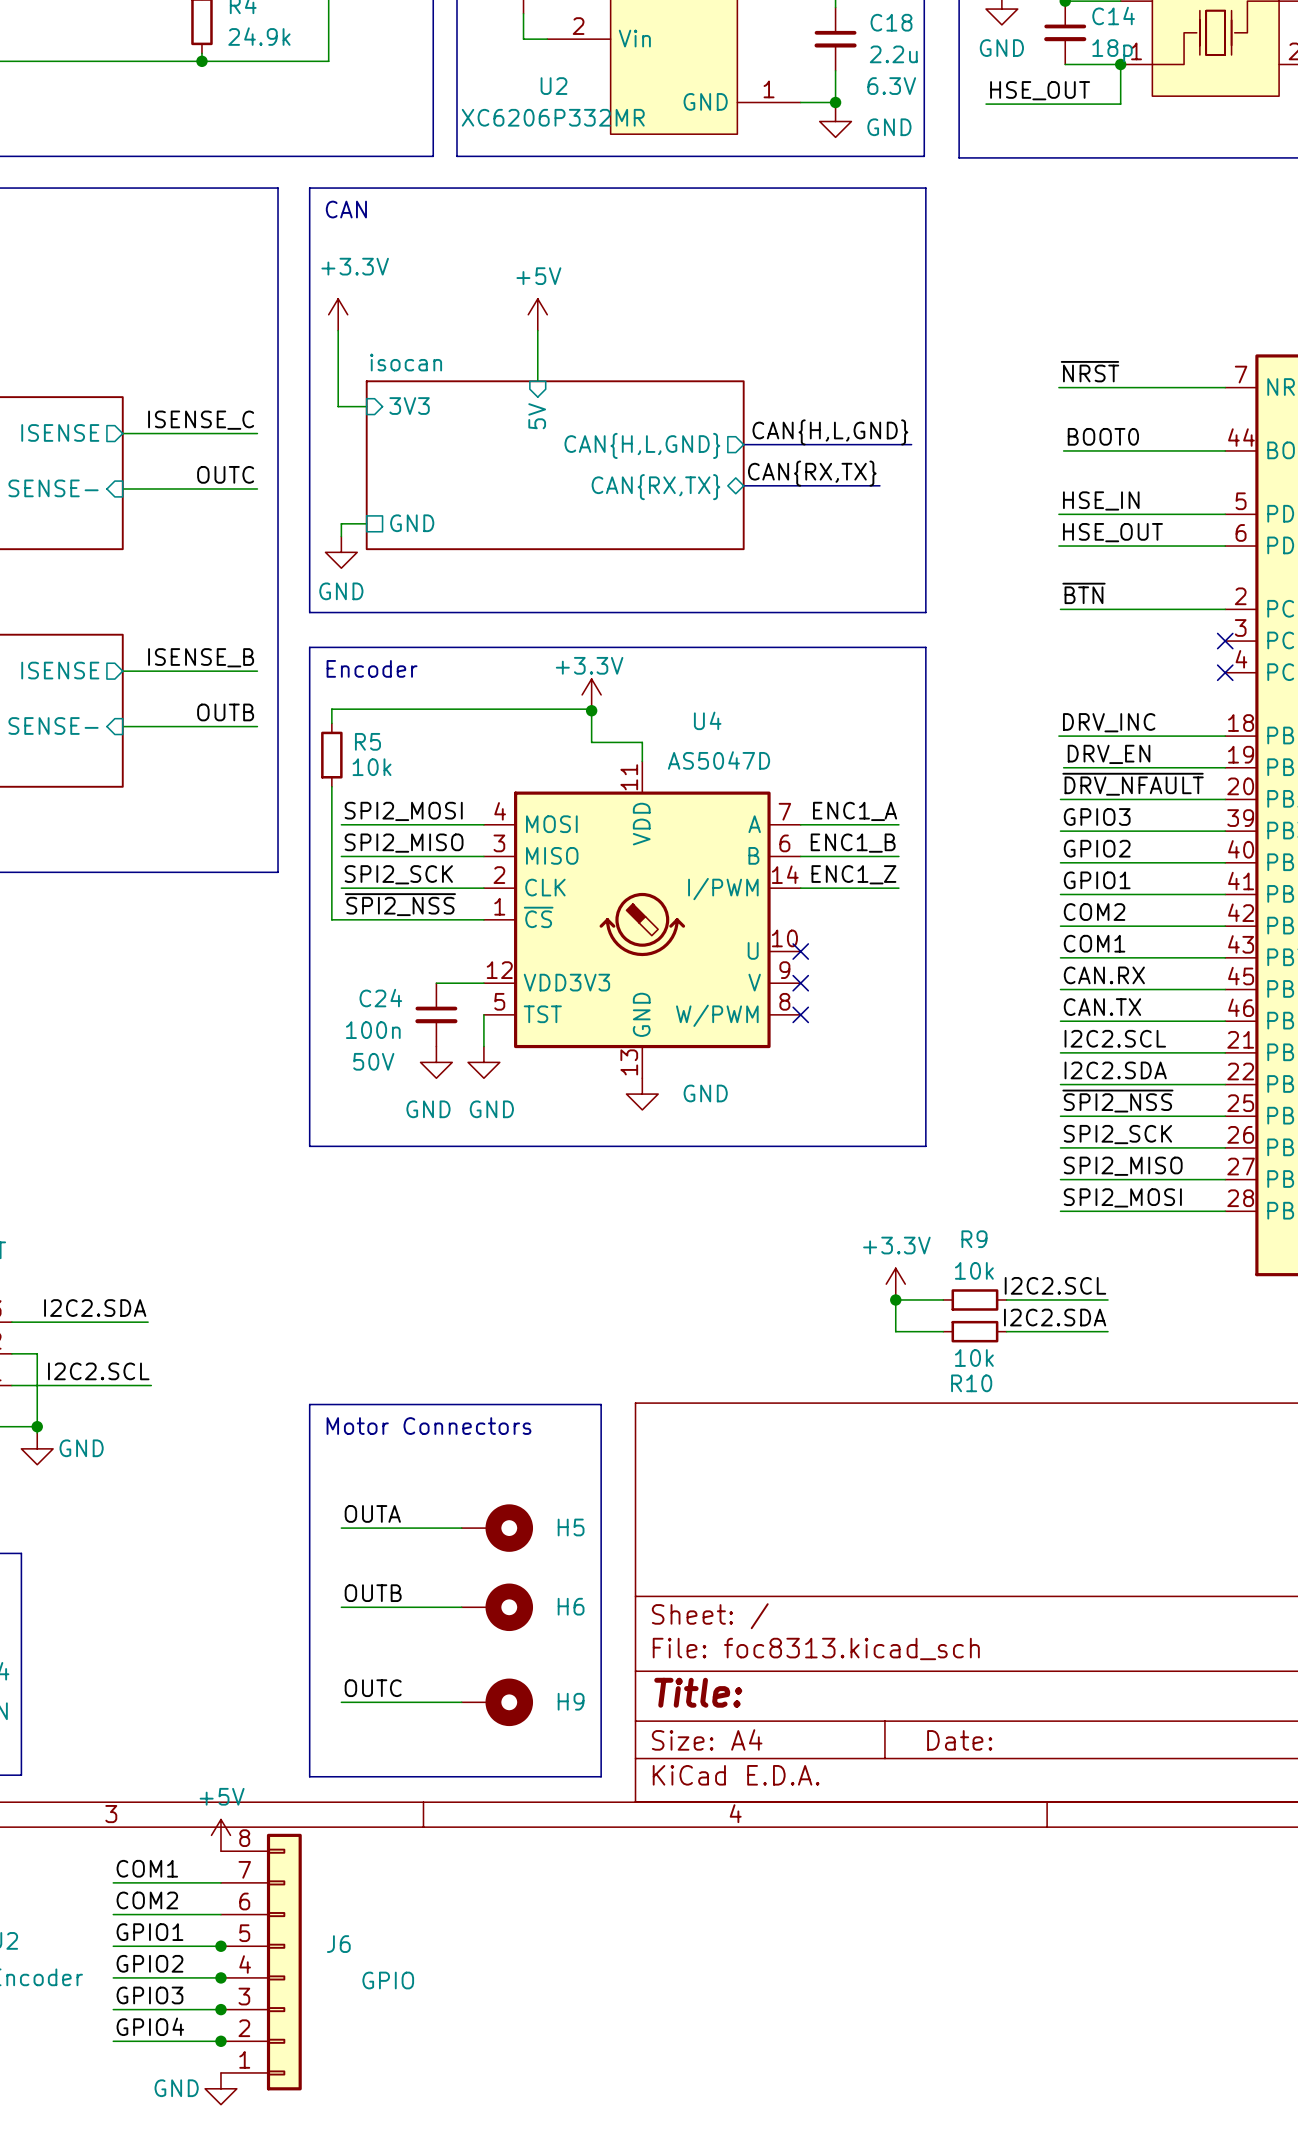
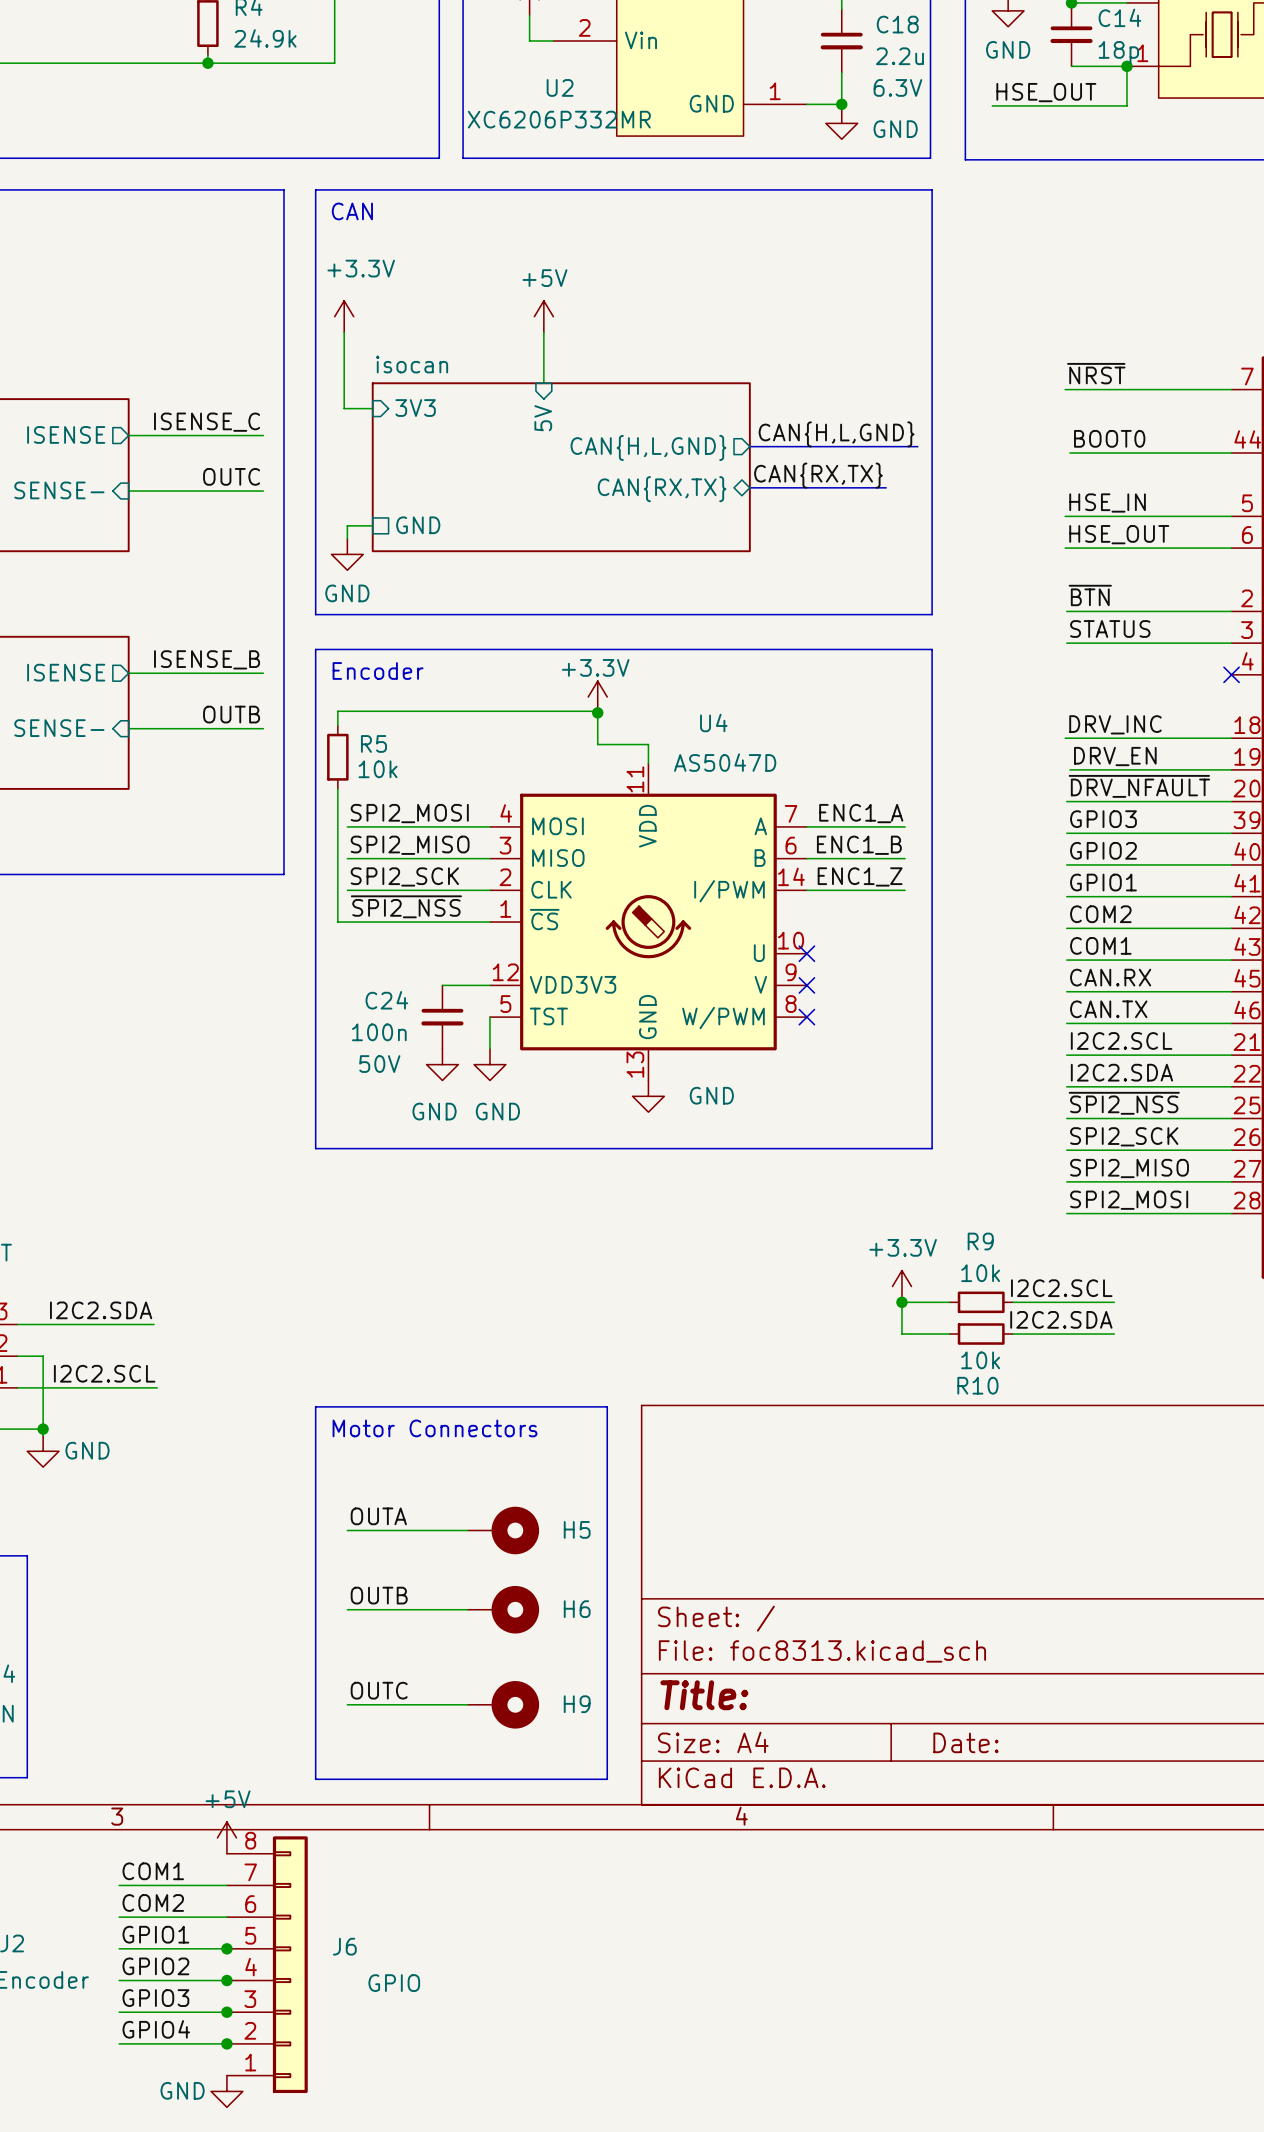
label: none -> STATUS (1110, 628)
wire: none -> (1066, 643) (1231, 643)
no-connect mark: (1225, 641) -> none

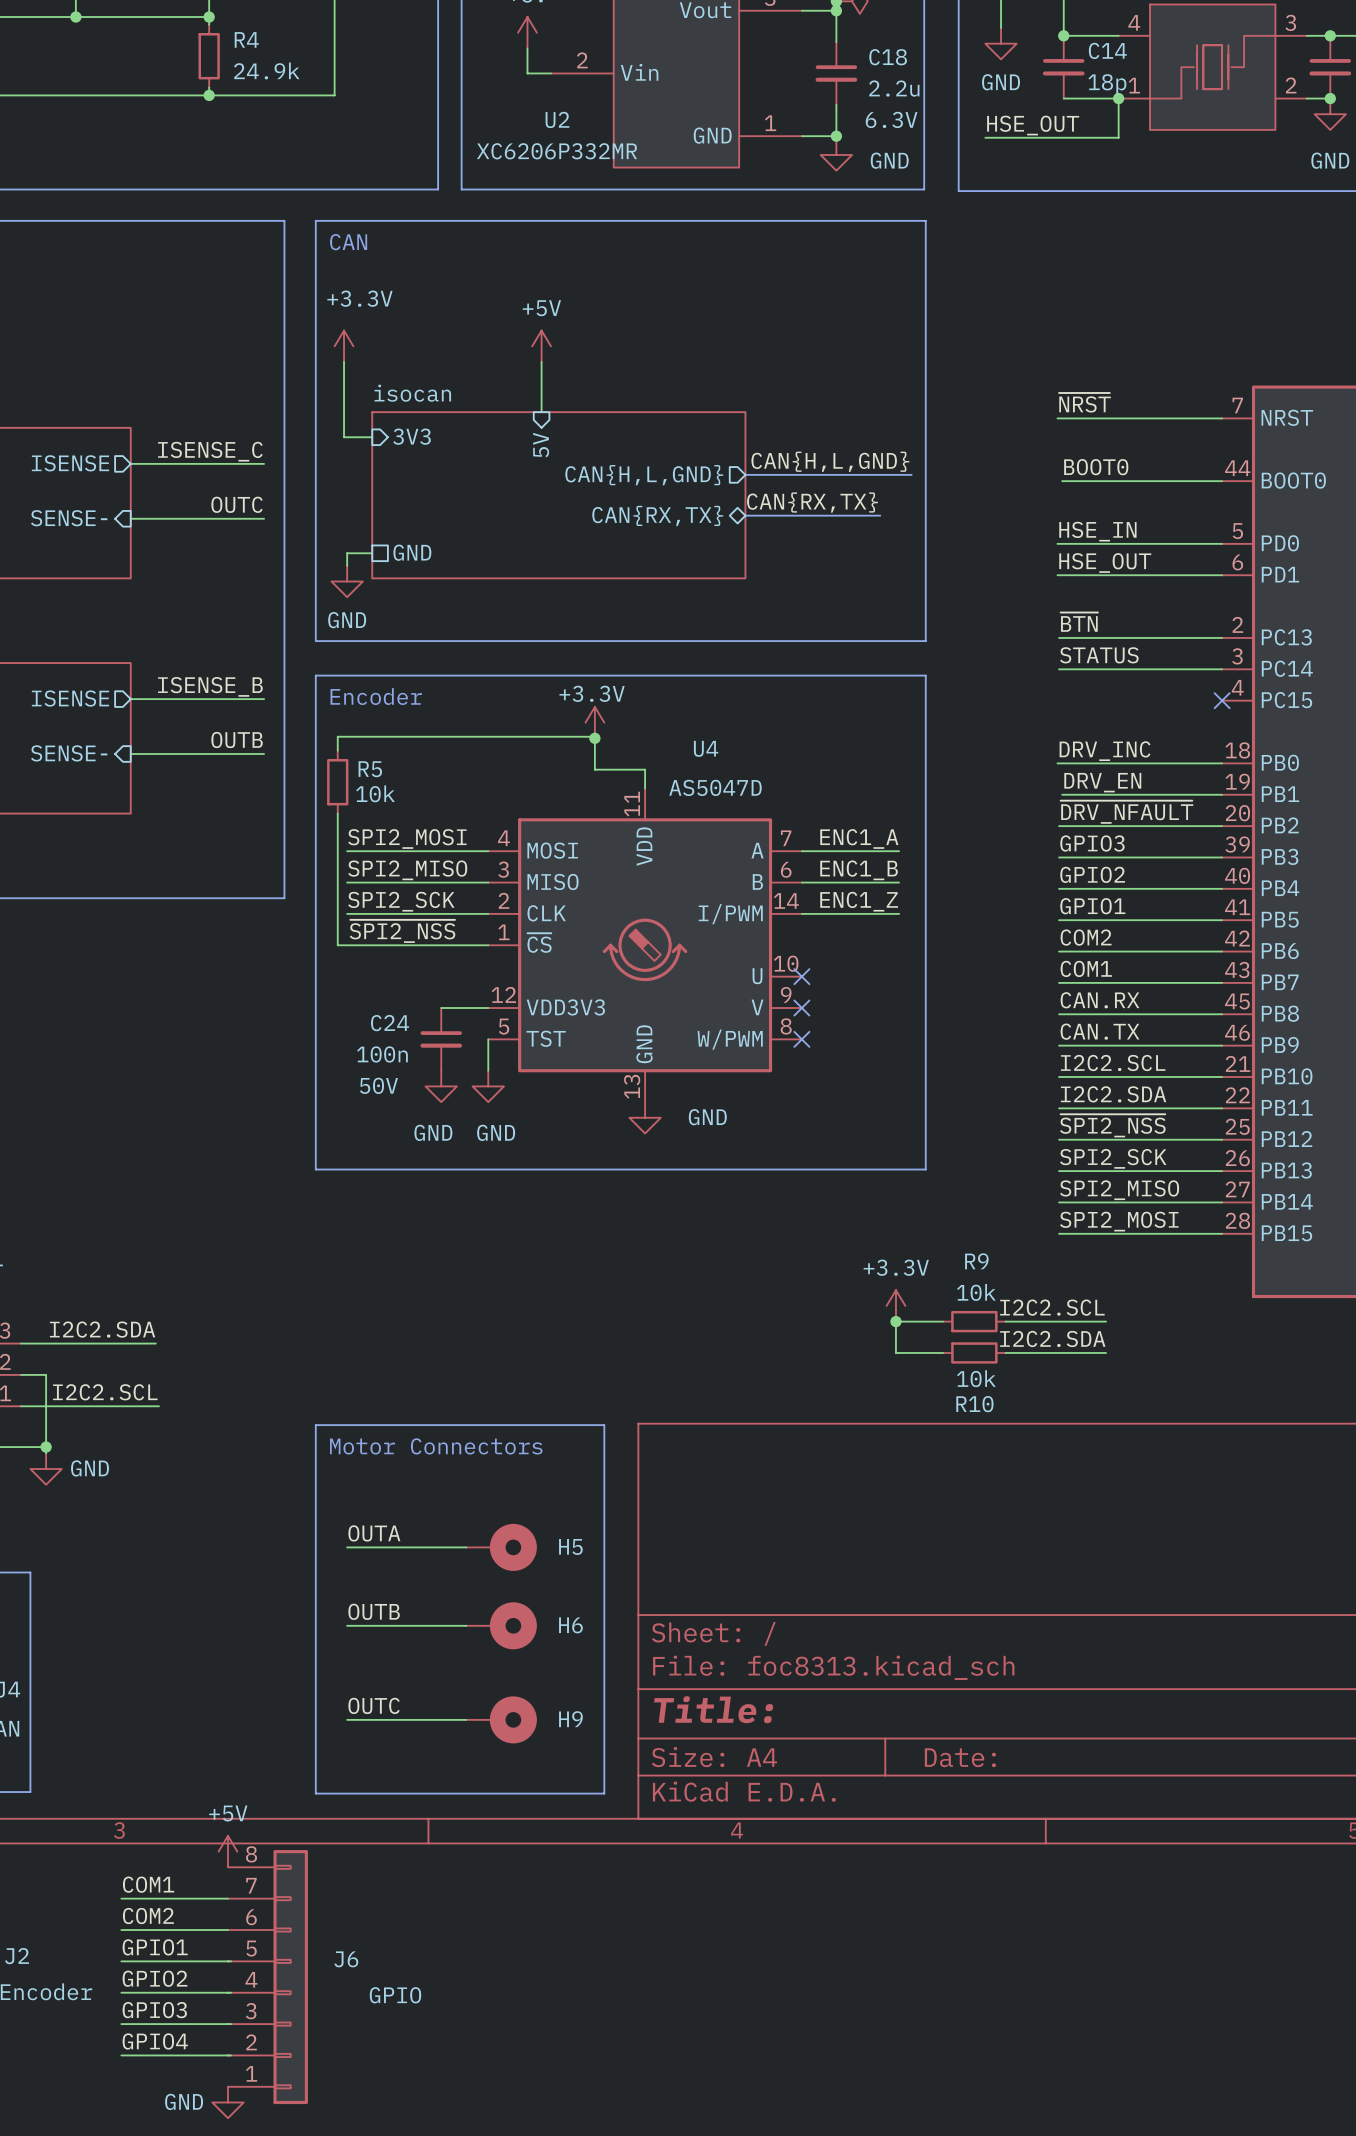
junction: (226, 1948) -> none
junction: (226, 1980) -> none
junction: (226, 2012) -> none
junction: (226, 2043) -> none

